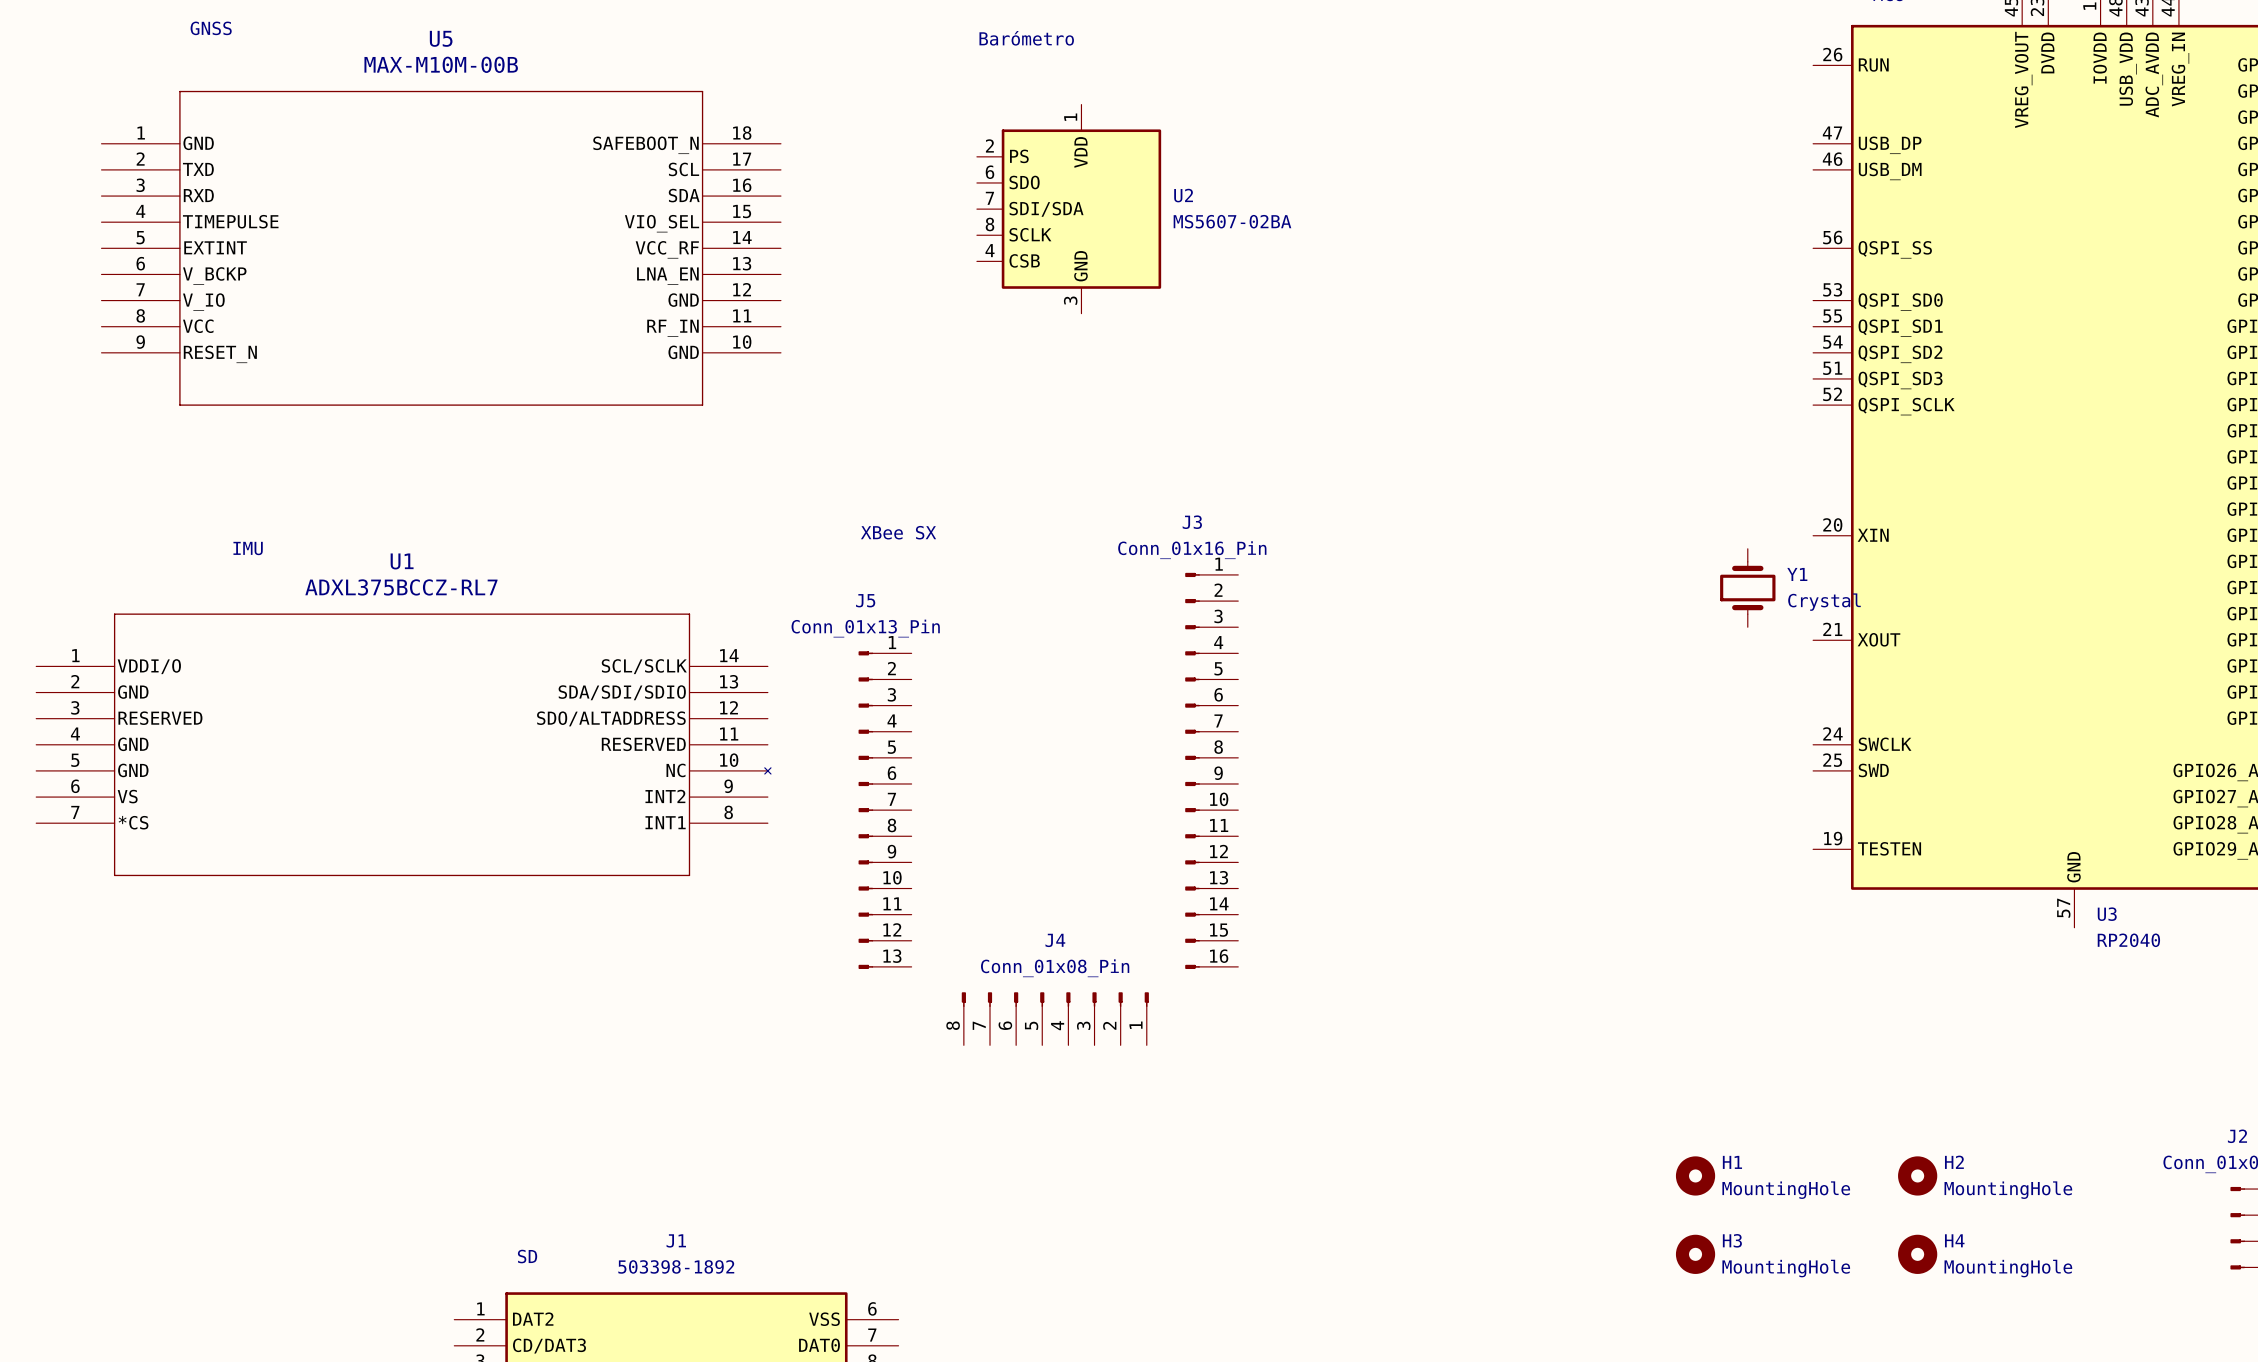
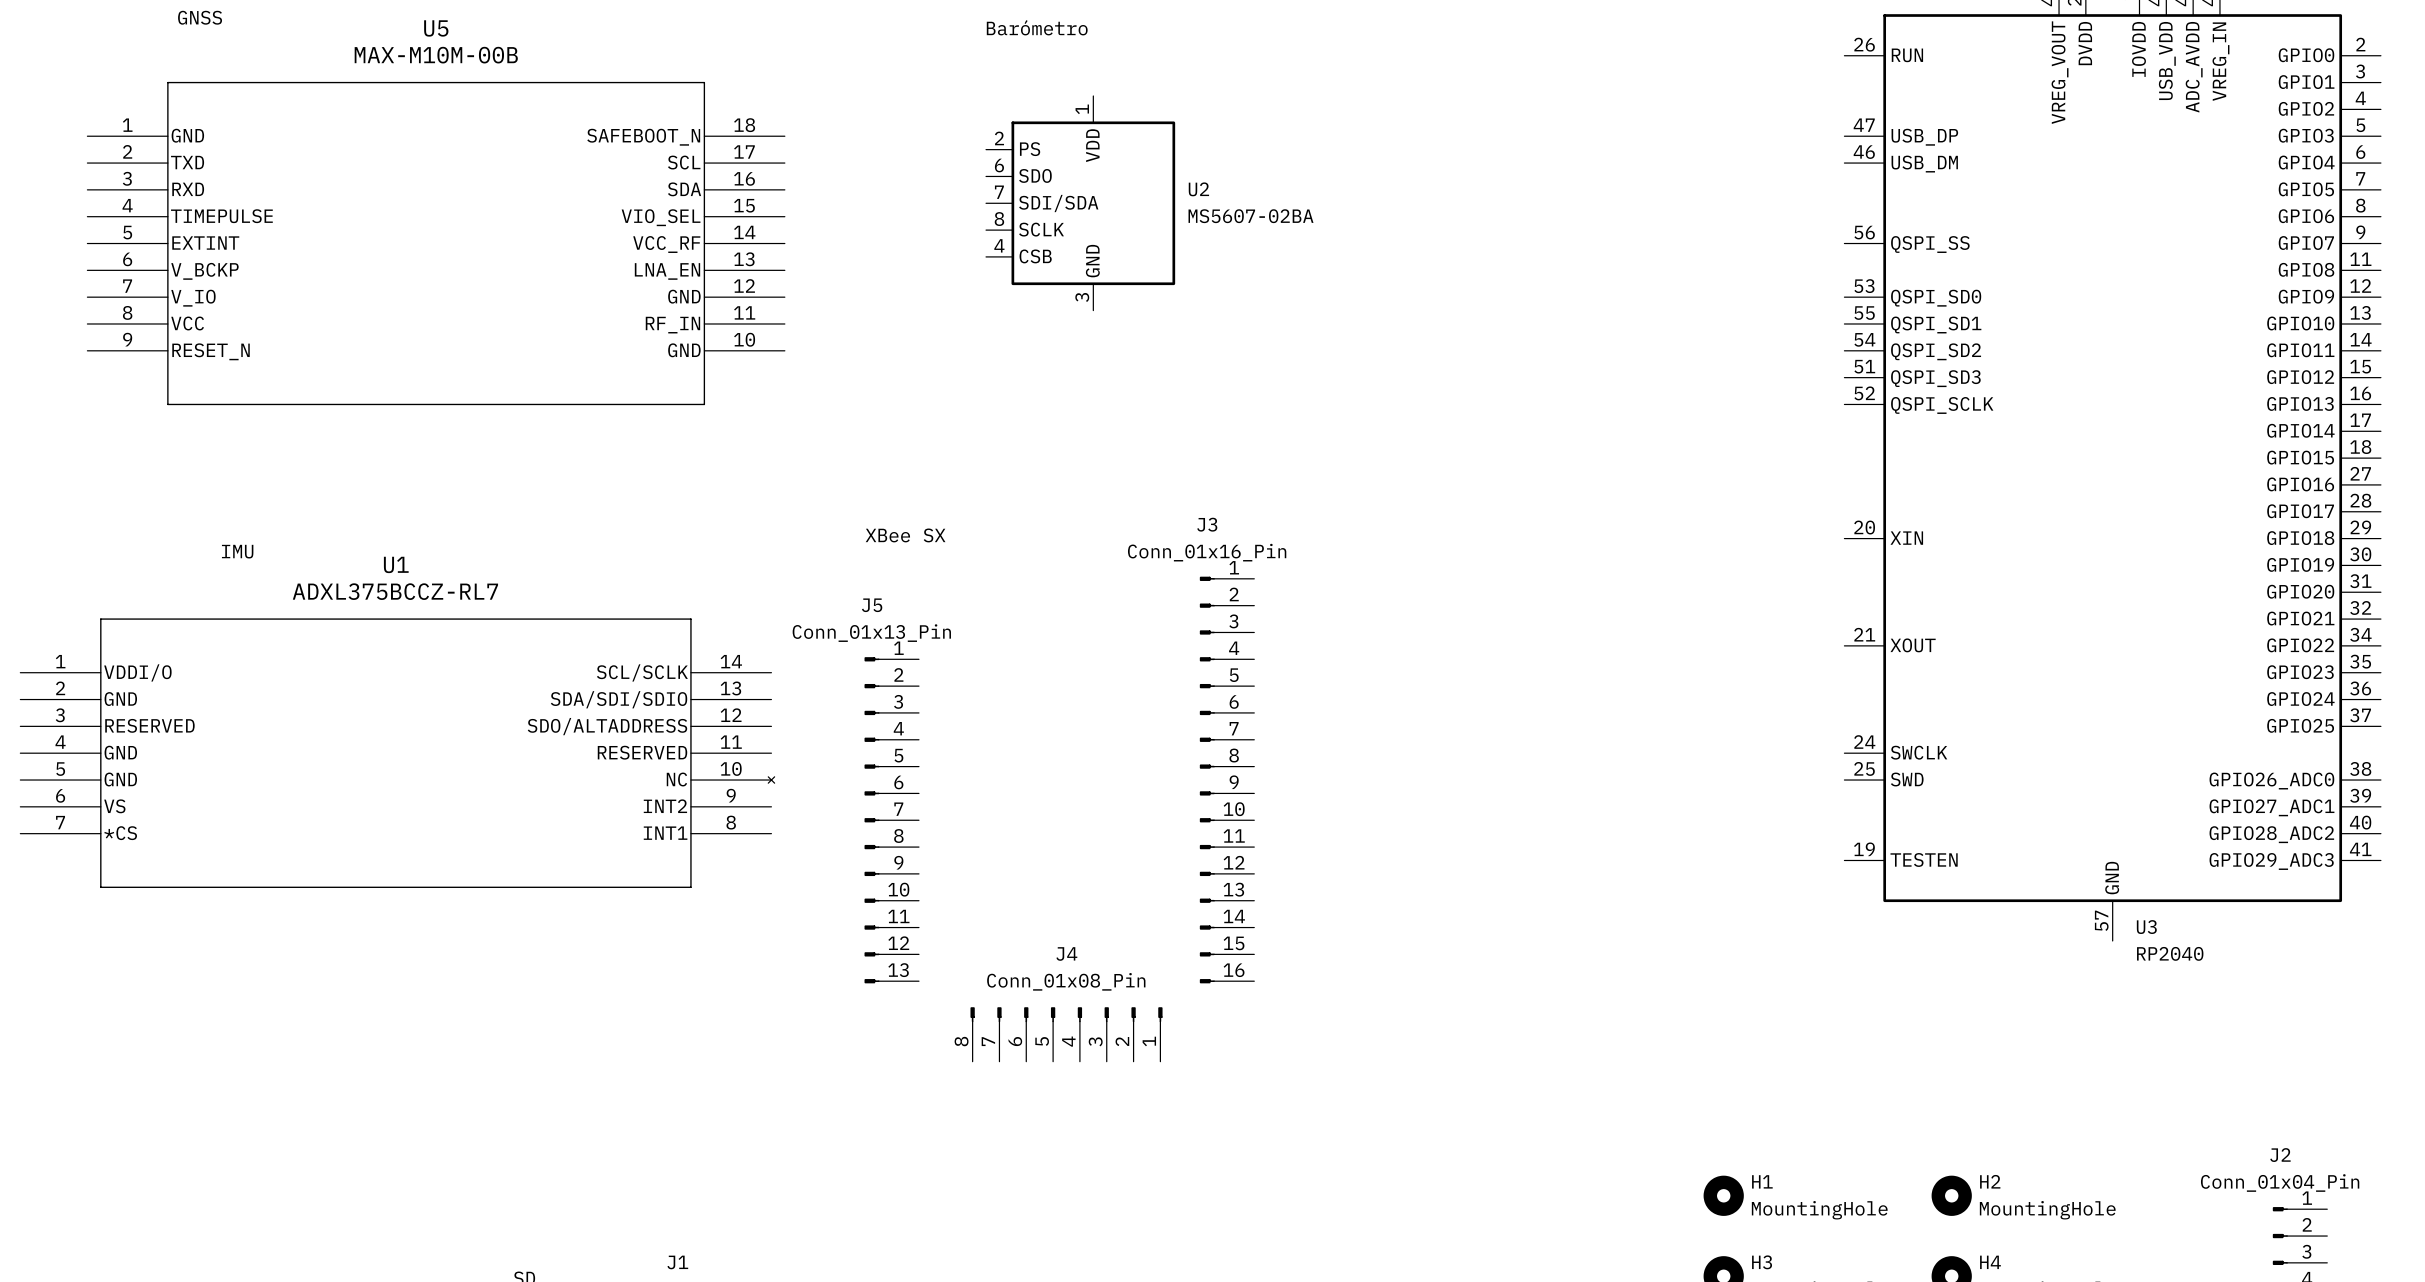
Y1: Crystal (1747, 588) -> none

